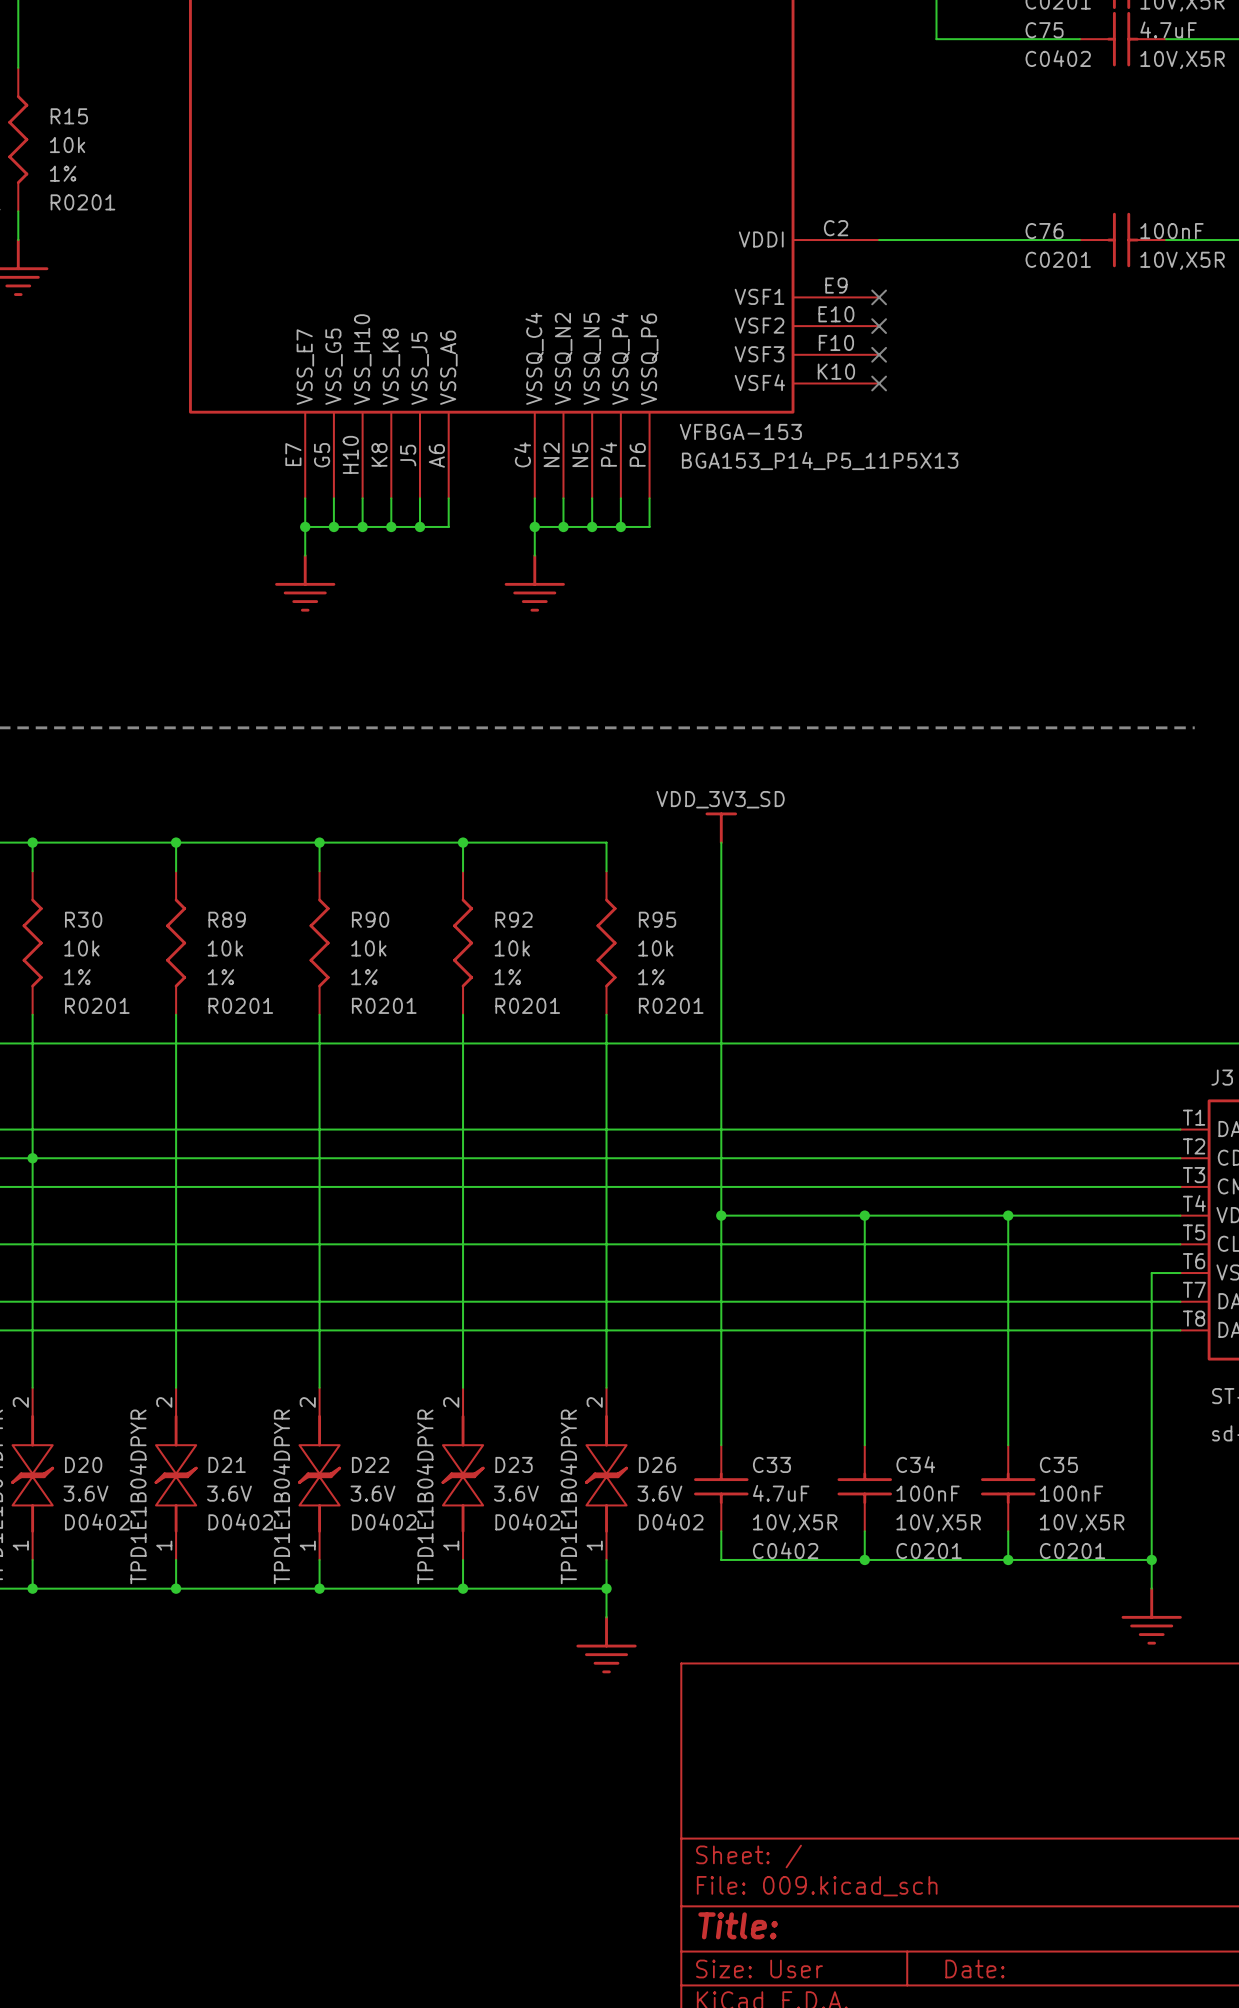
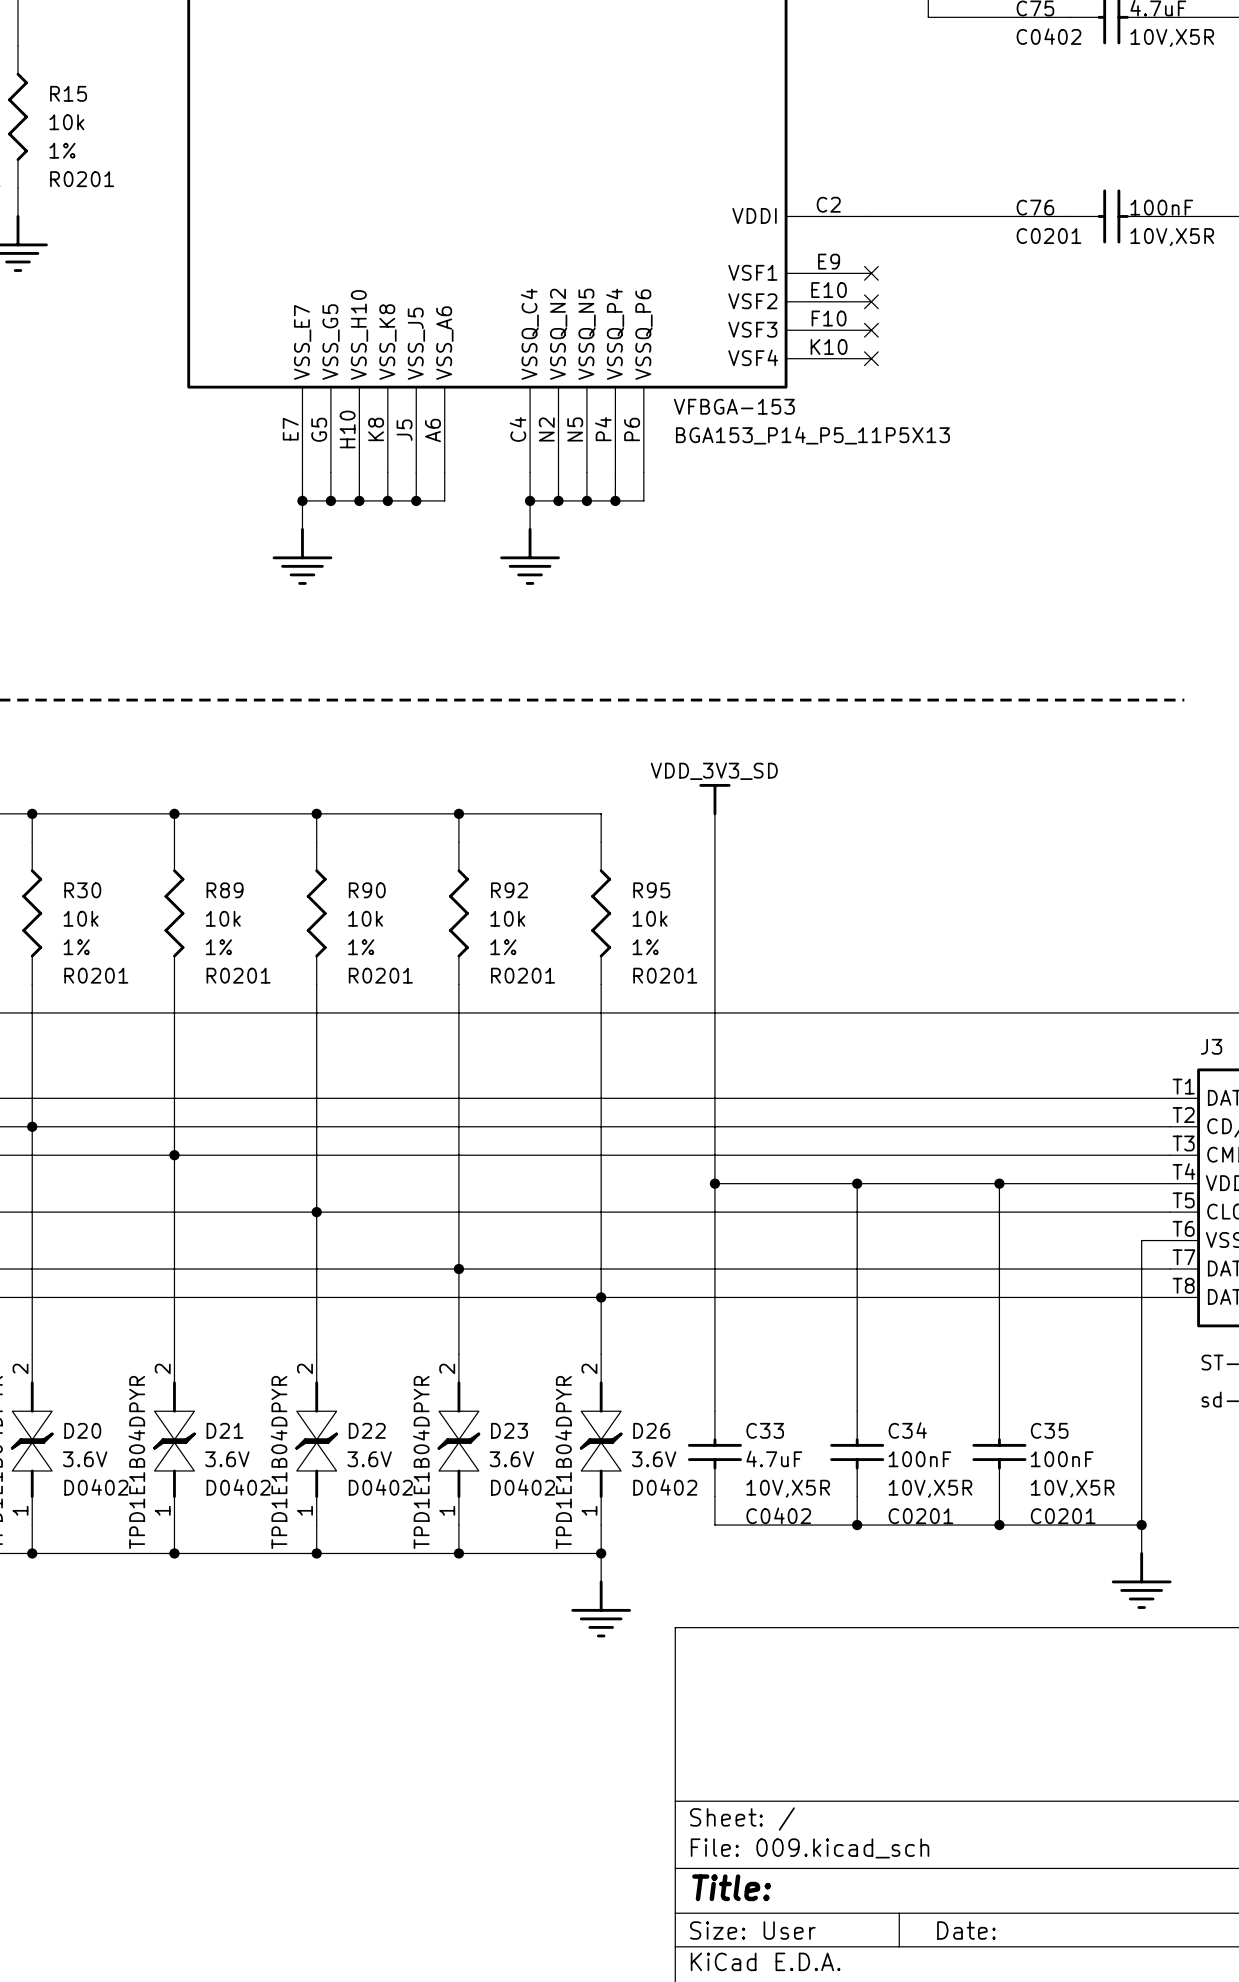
junction: none -> (174, 1155)
junction: none -> (316, 1212)
junction: none -> (458, 1269)
junction: none -> (601, 1297)

